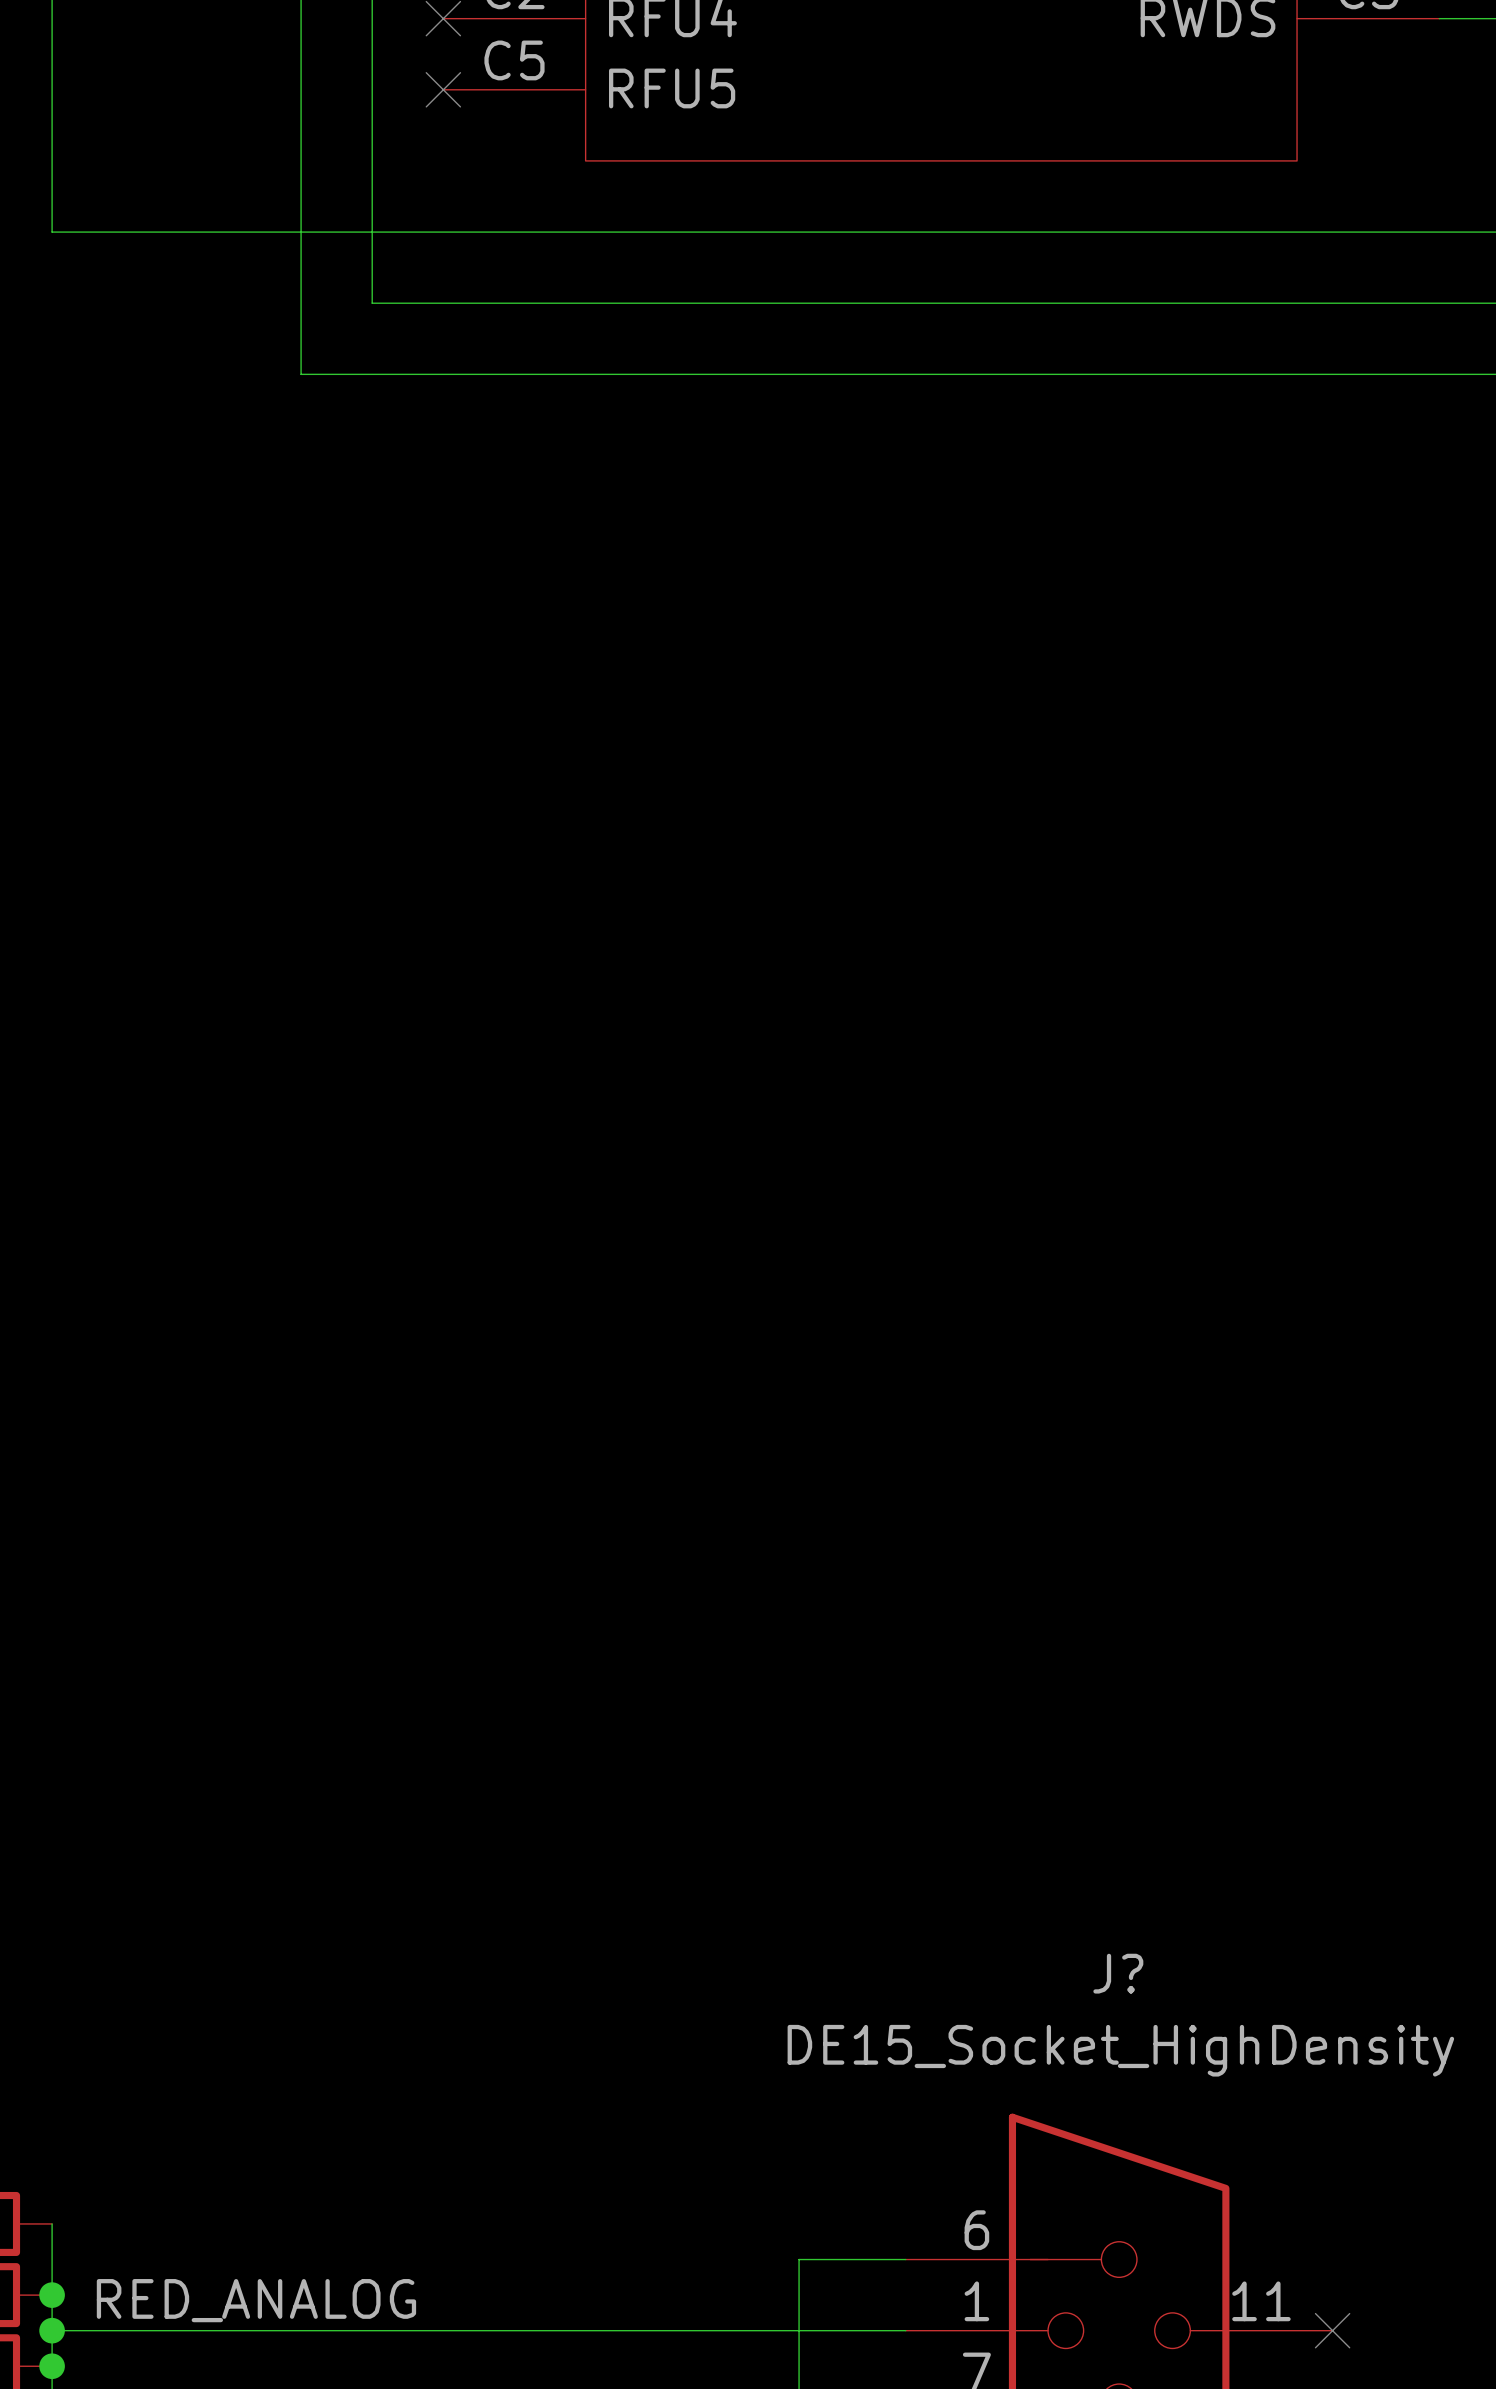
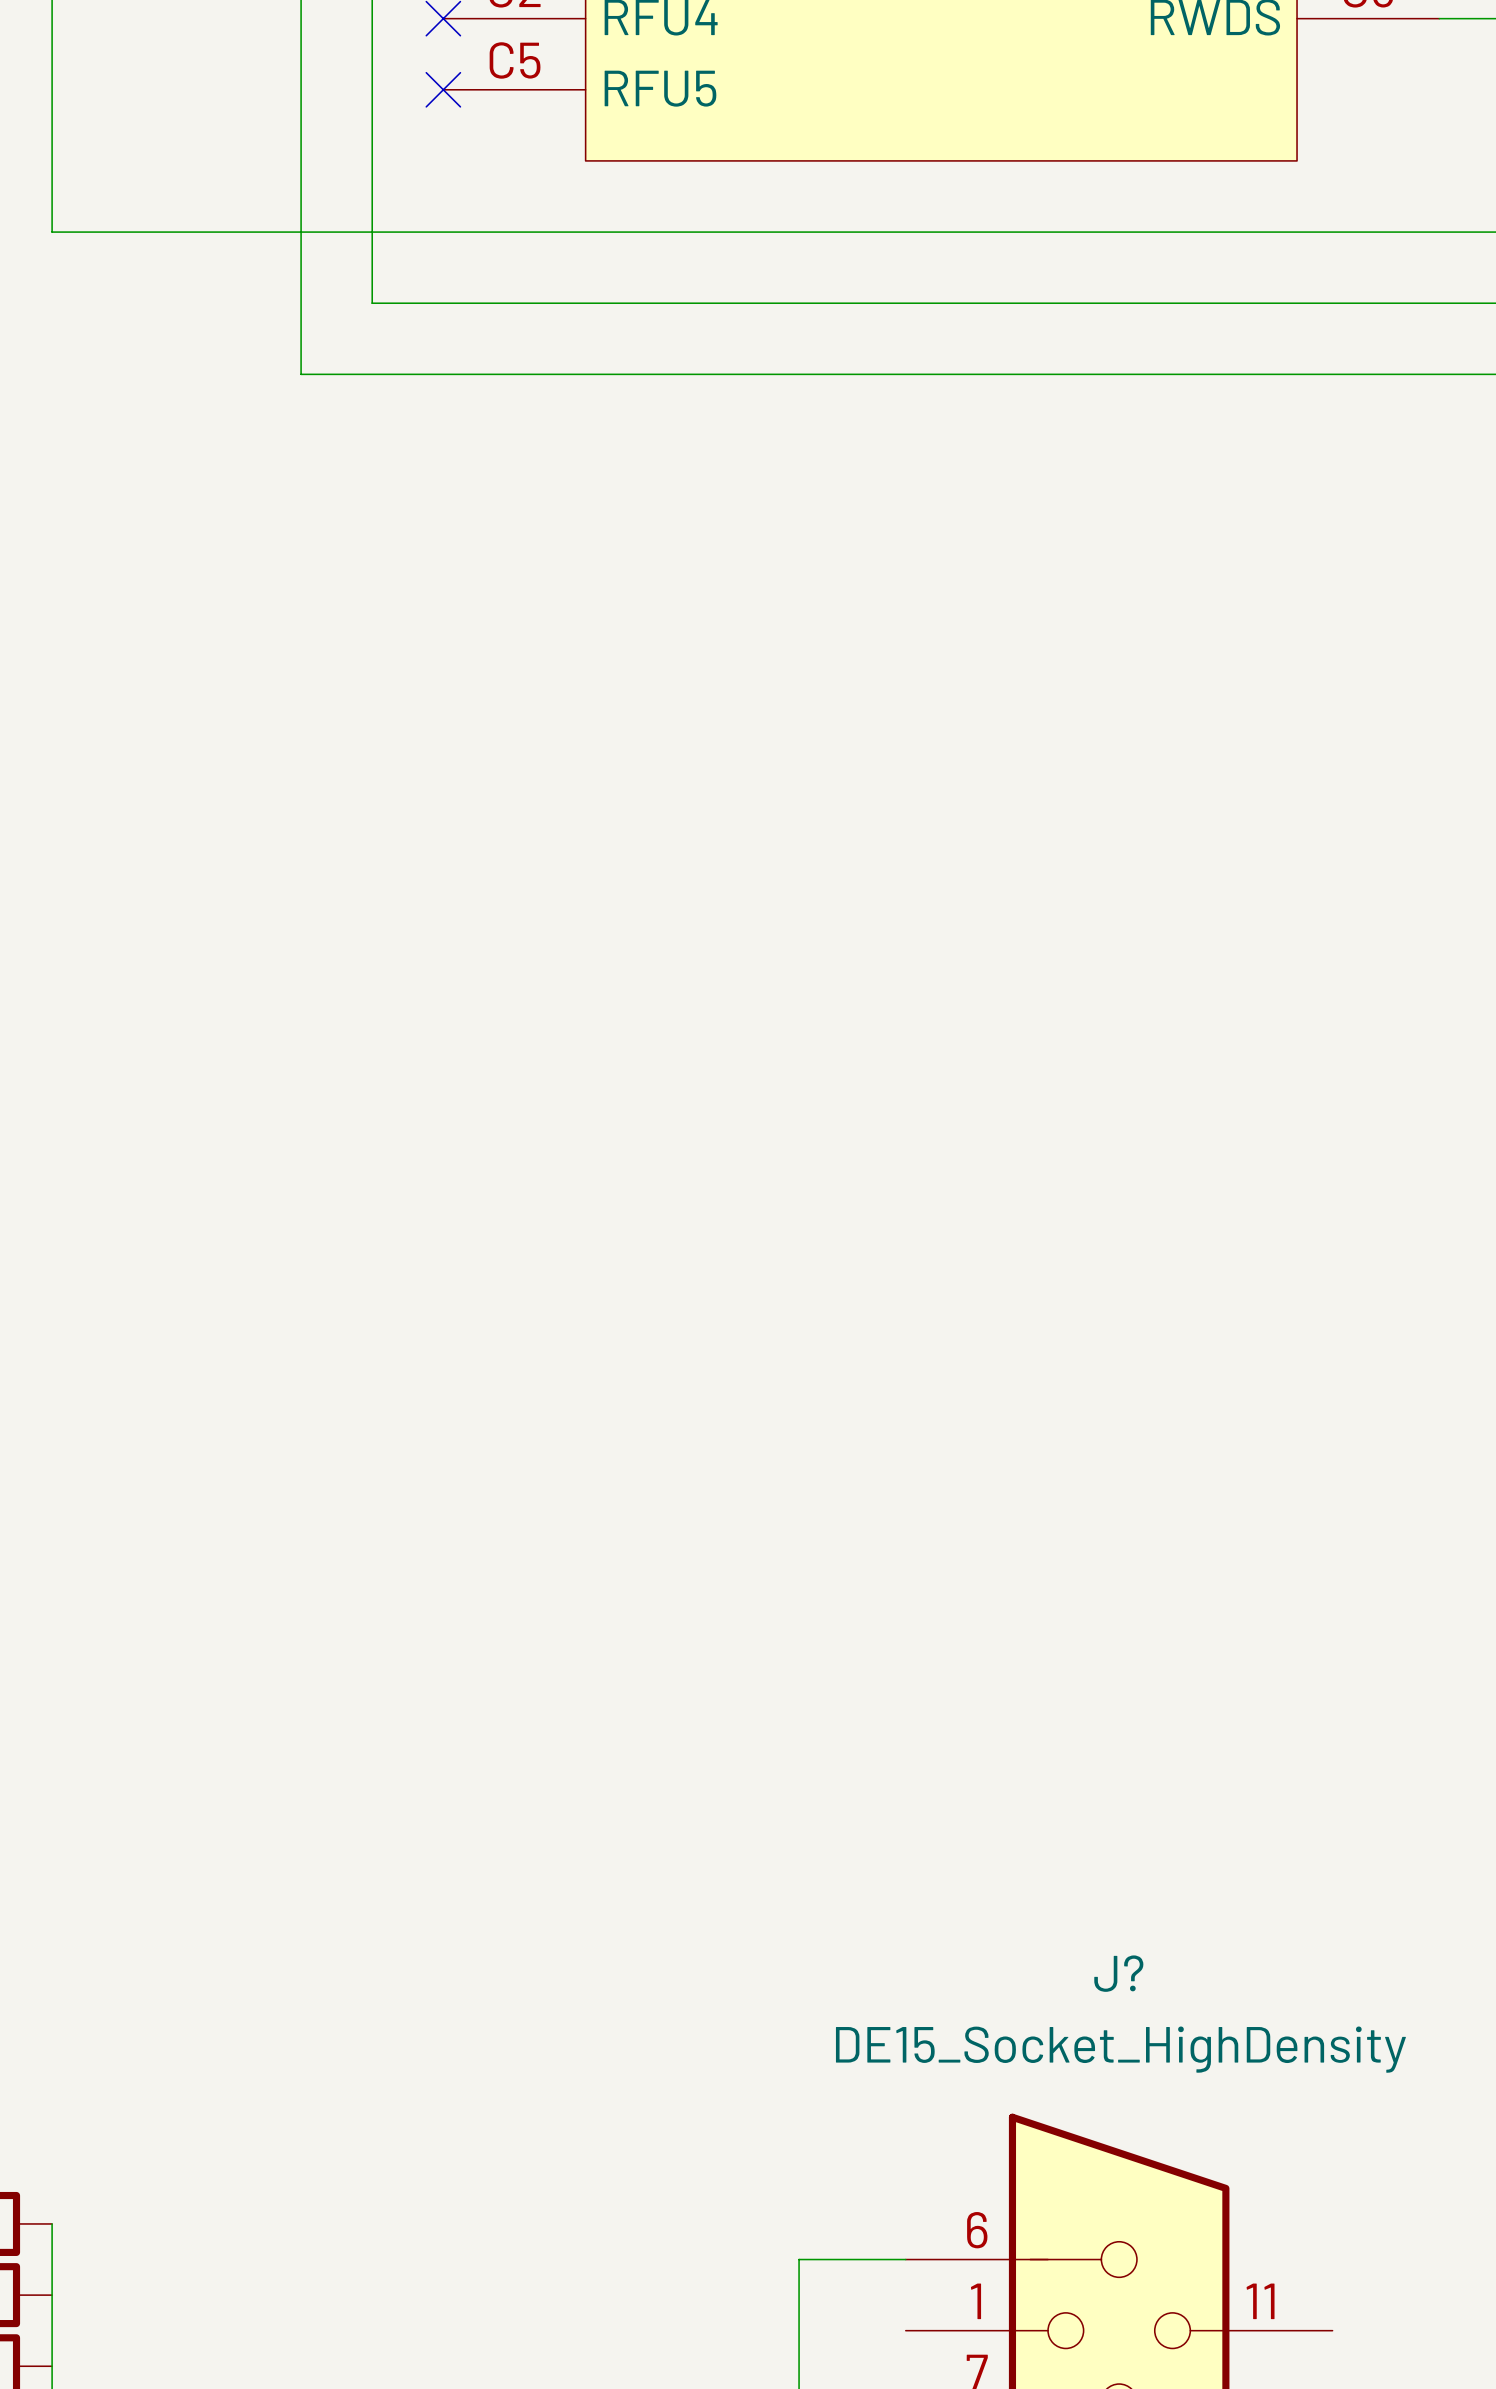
junction: (52, 2295) -> none
label: RED_ANALOG (256, 2300) -> none
wire: (52, 2330) (905, 2330) -> none
junction: (52, 2330) -> none
no-connect mark: (1332, 2330) -> none
junction: (52, 2366) -> none

